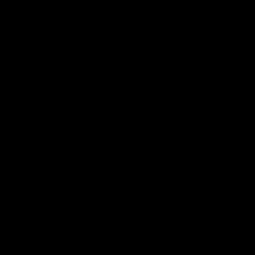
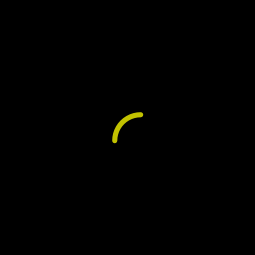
board edge: none -> (140, 114) (130, 116) (122, 122) (116, 130) (114, 140)

